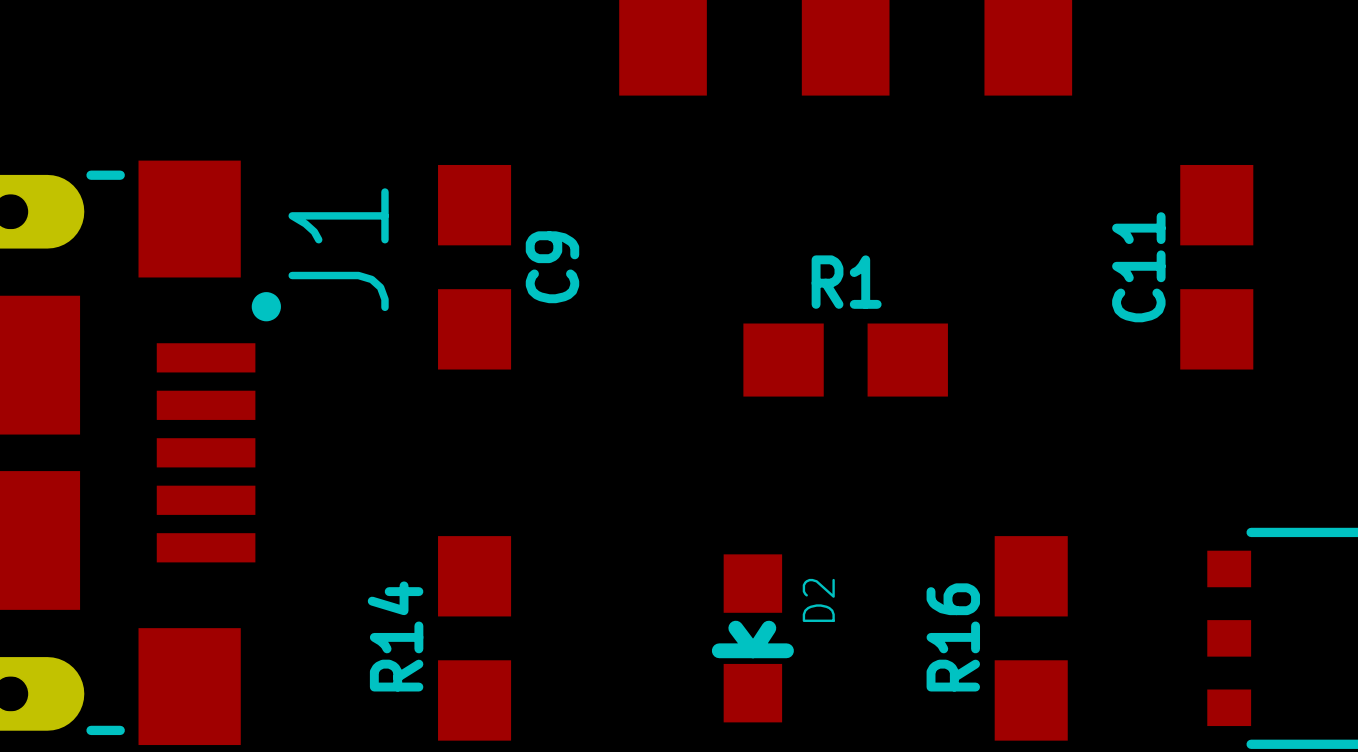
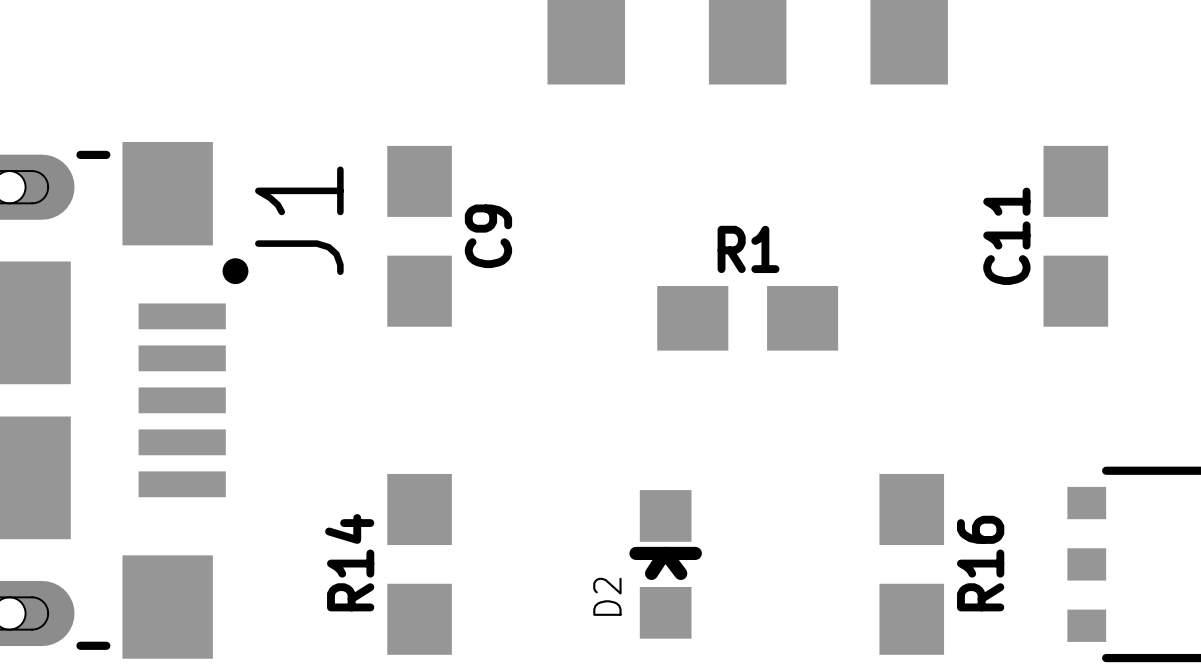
R16 name position: R16 (953, 637) -> R16 (980, 563)
D2 rotation: 0° (752, 638) -> 180° (665, 564)

